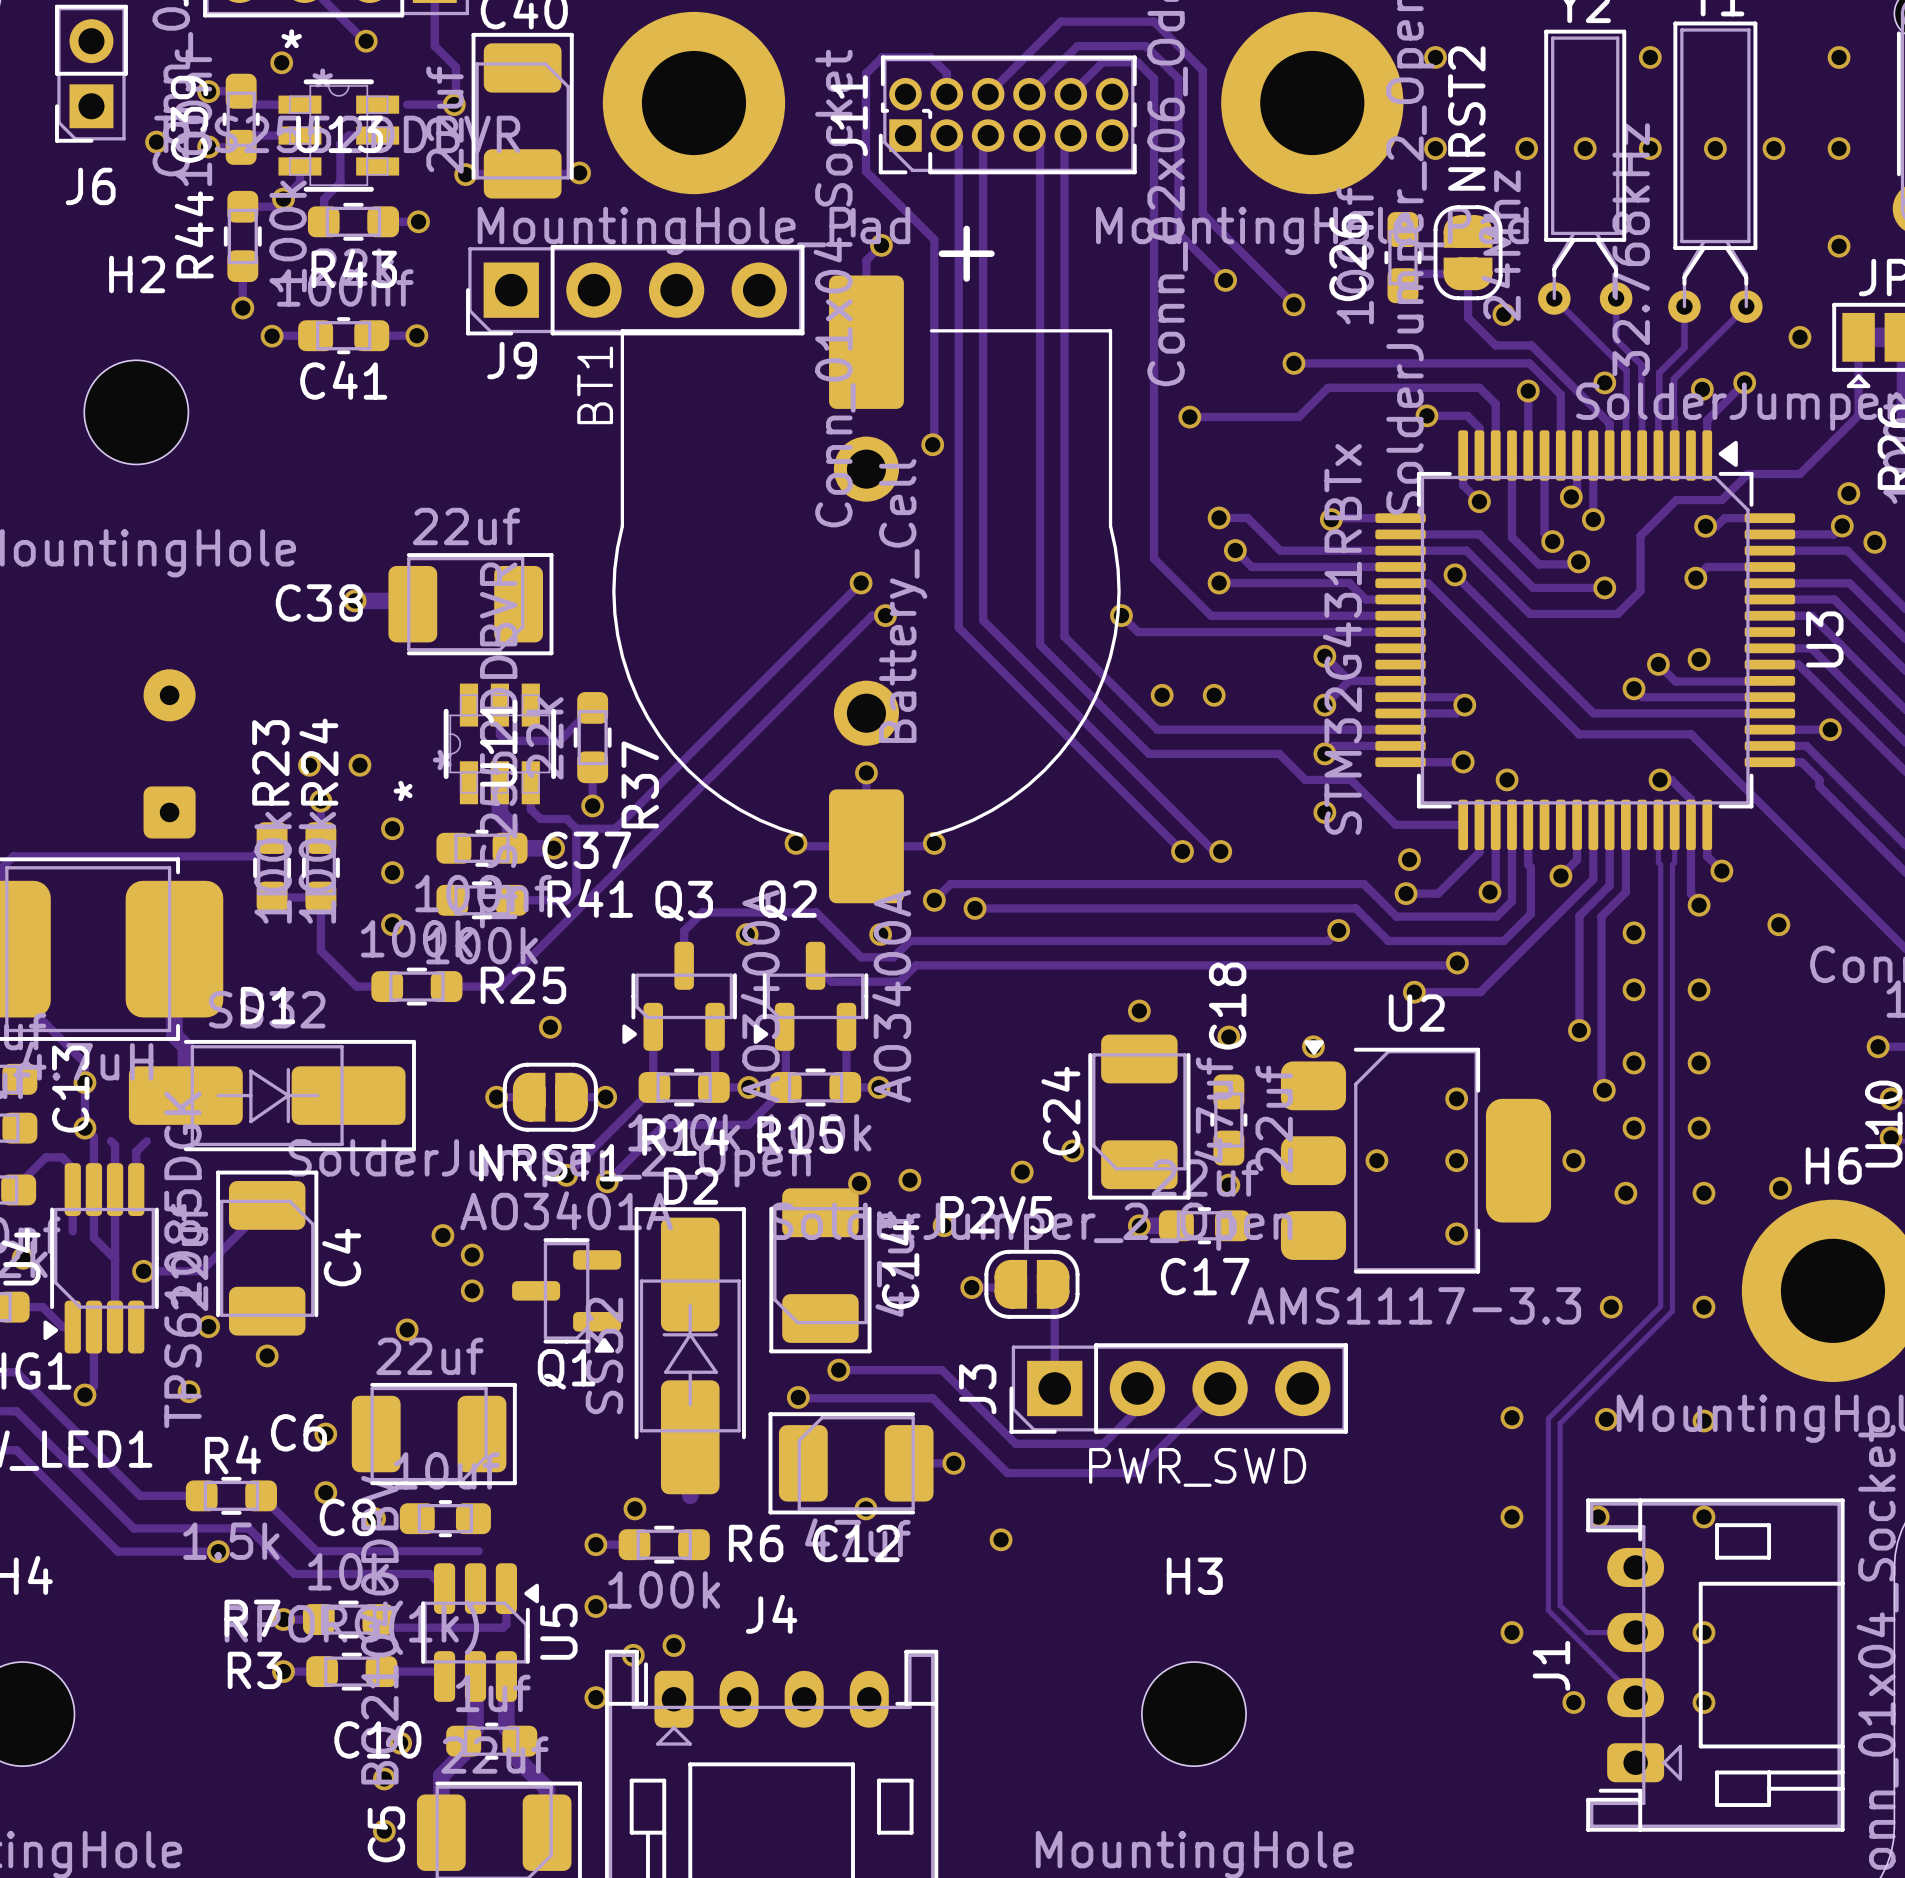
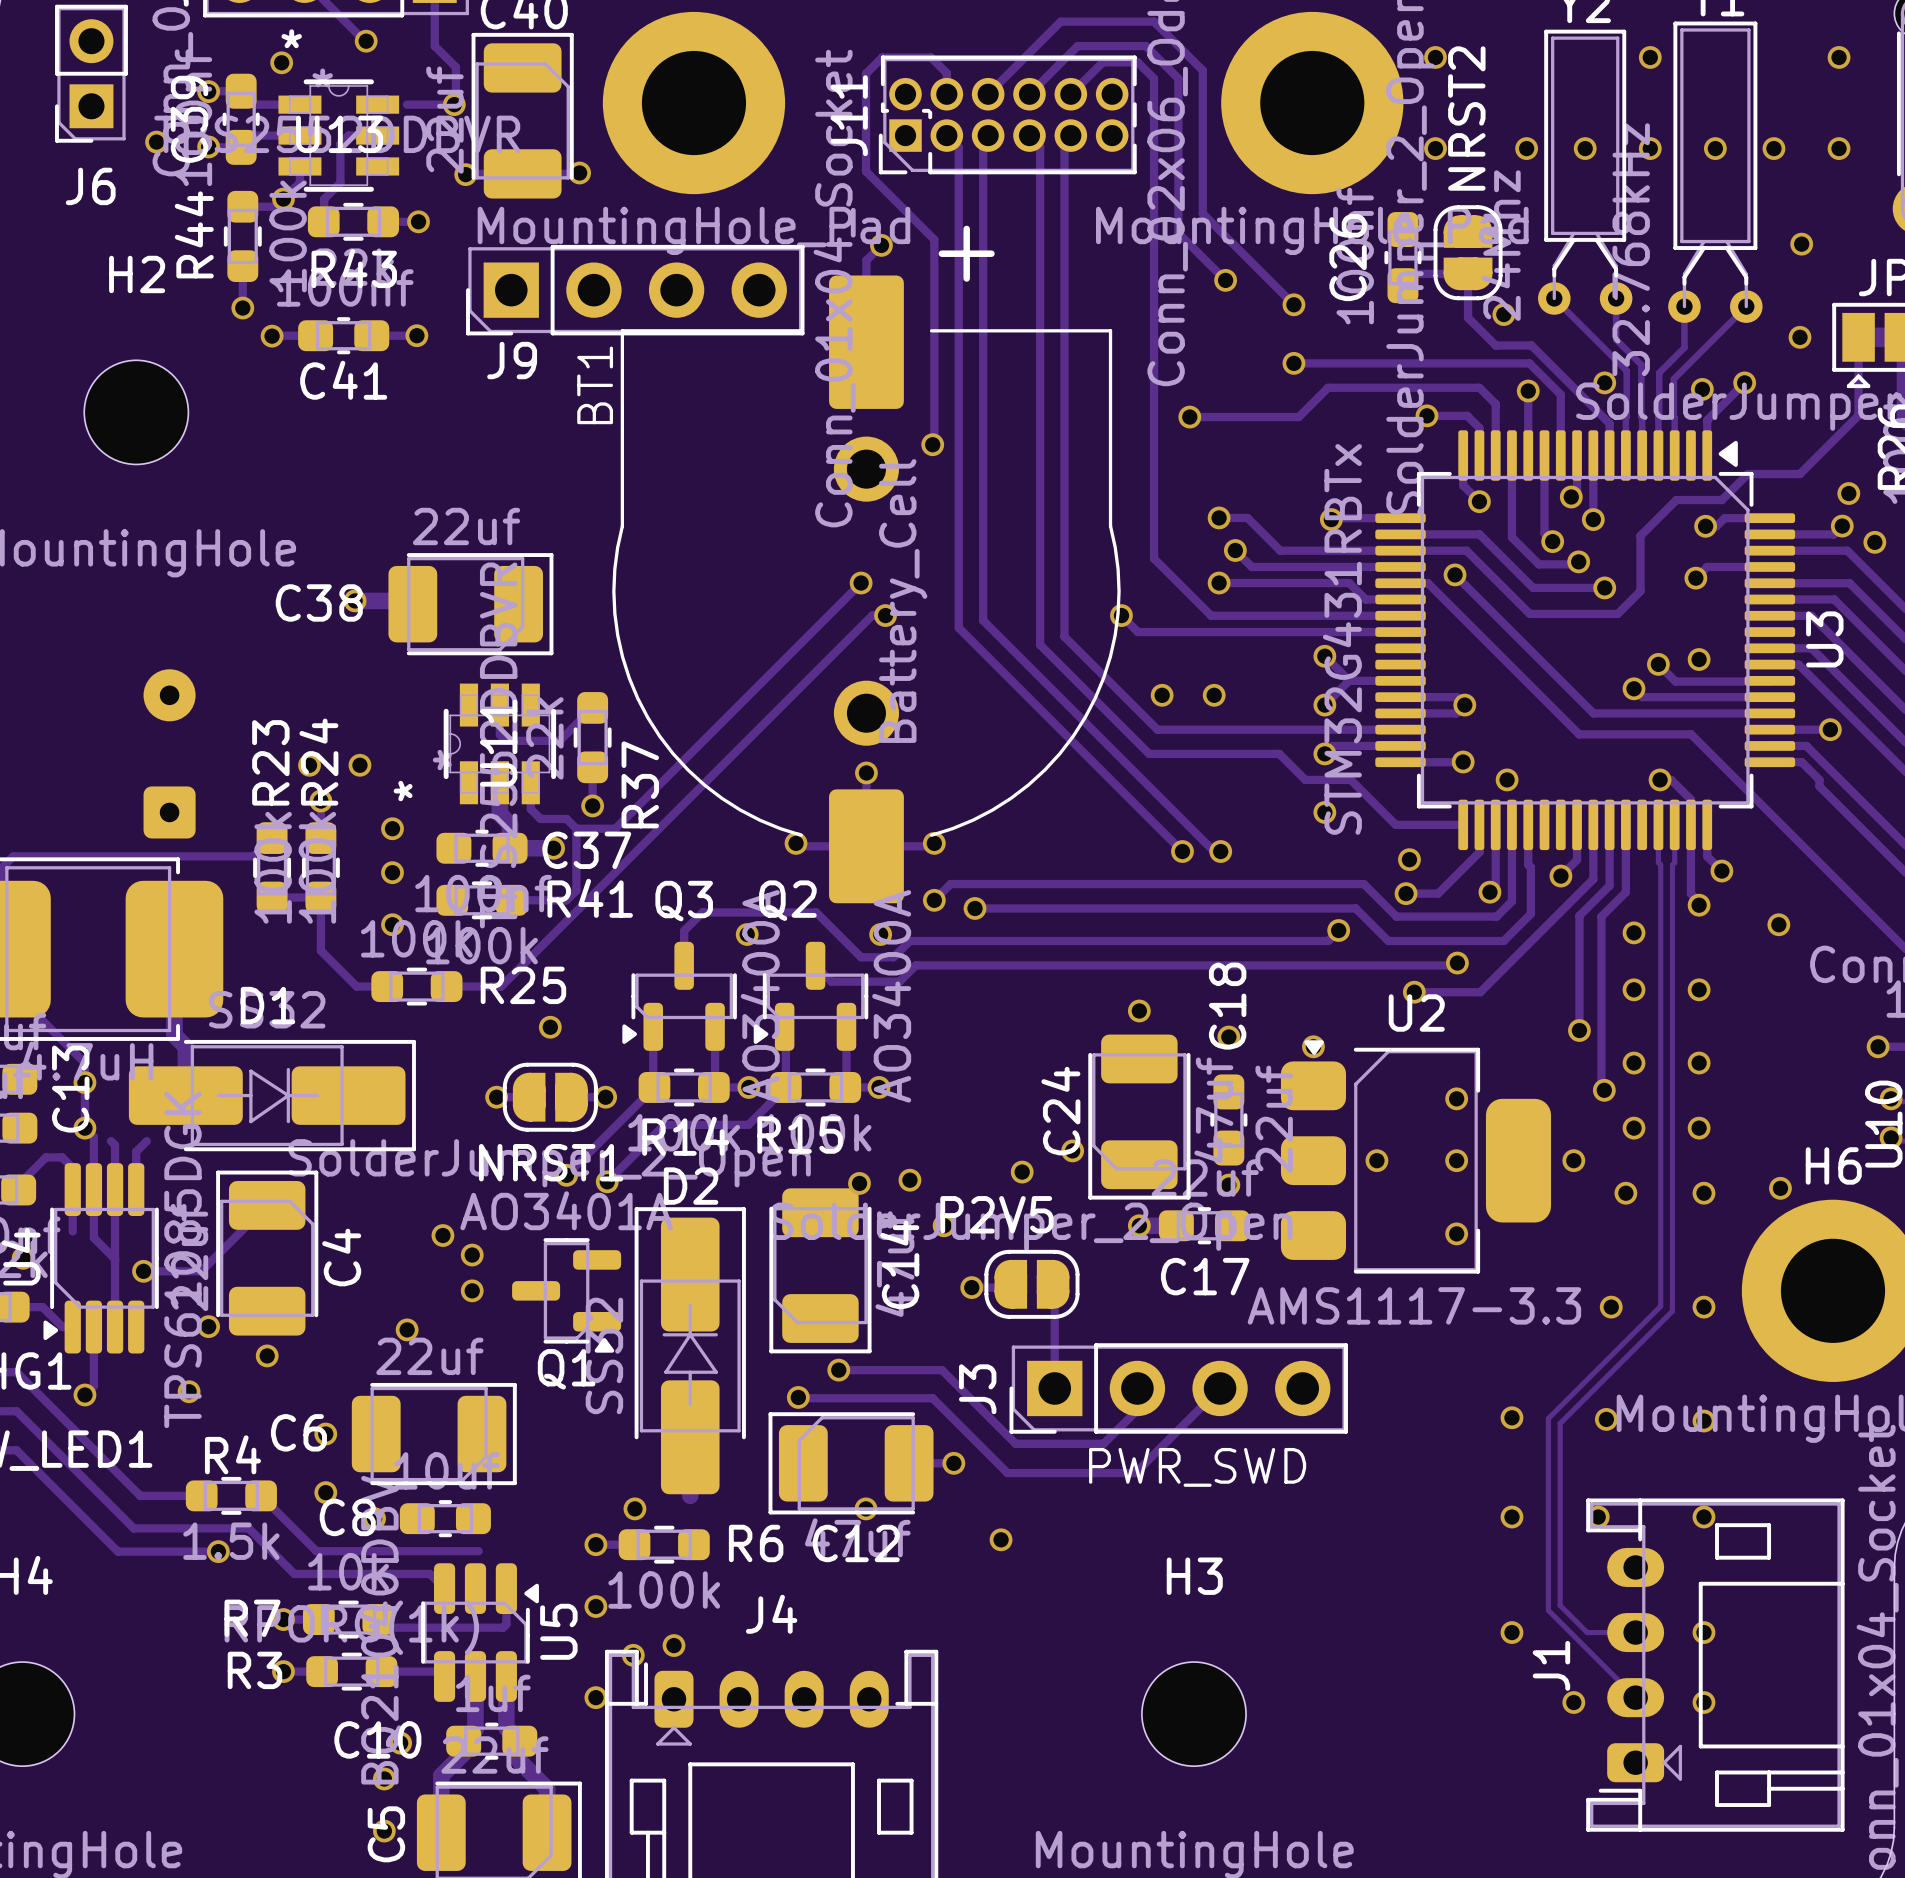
via position: (1839, 246) -> (1801, 244)

